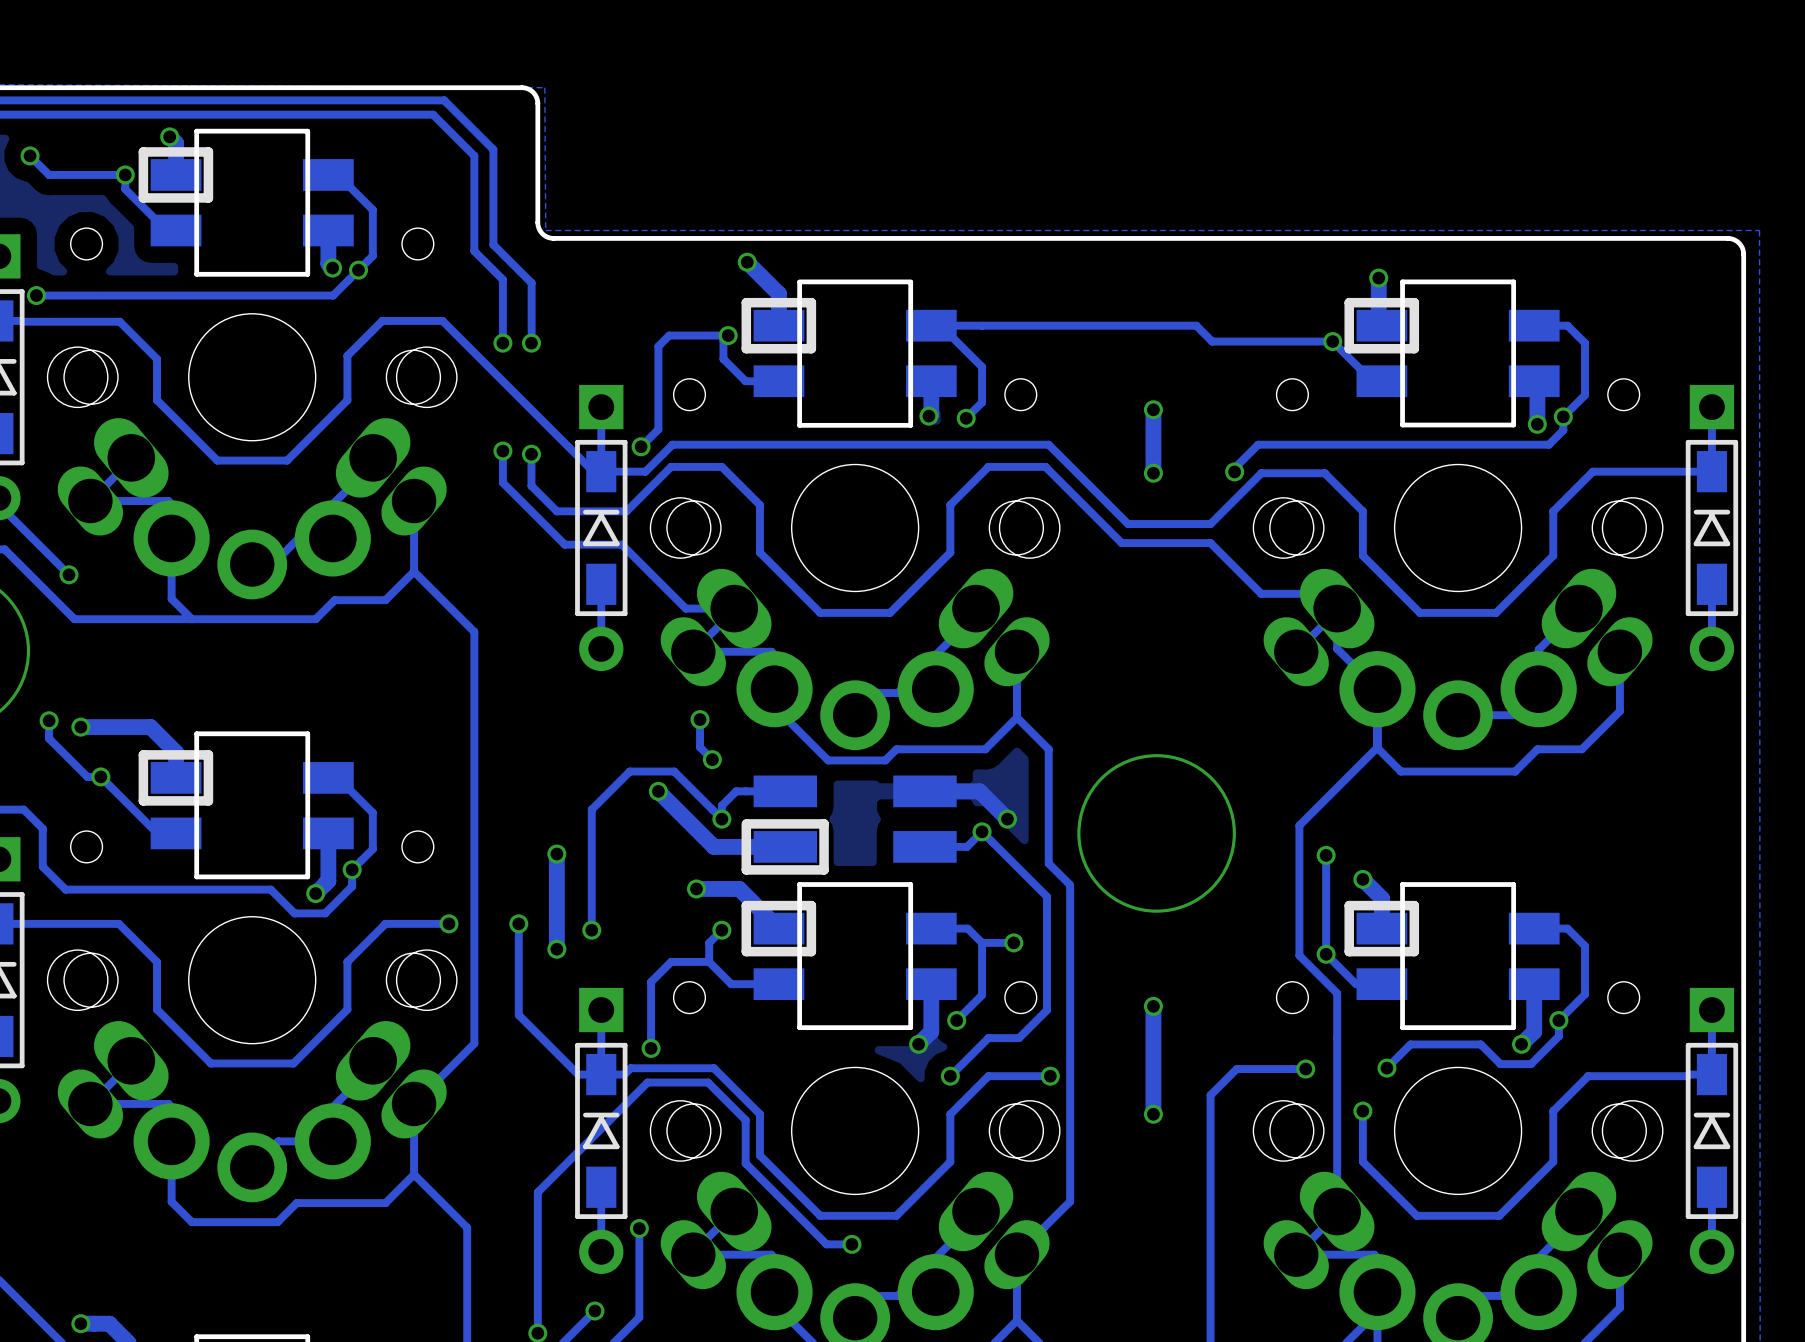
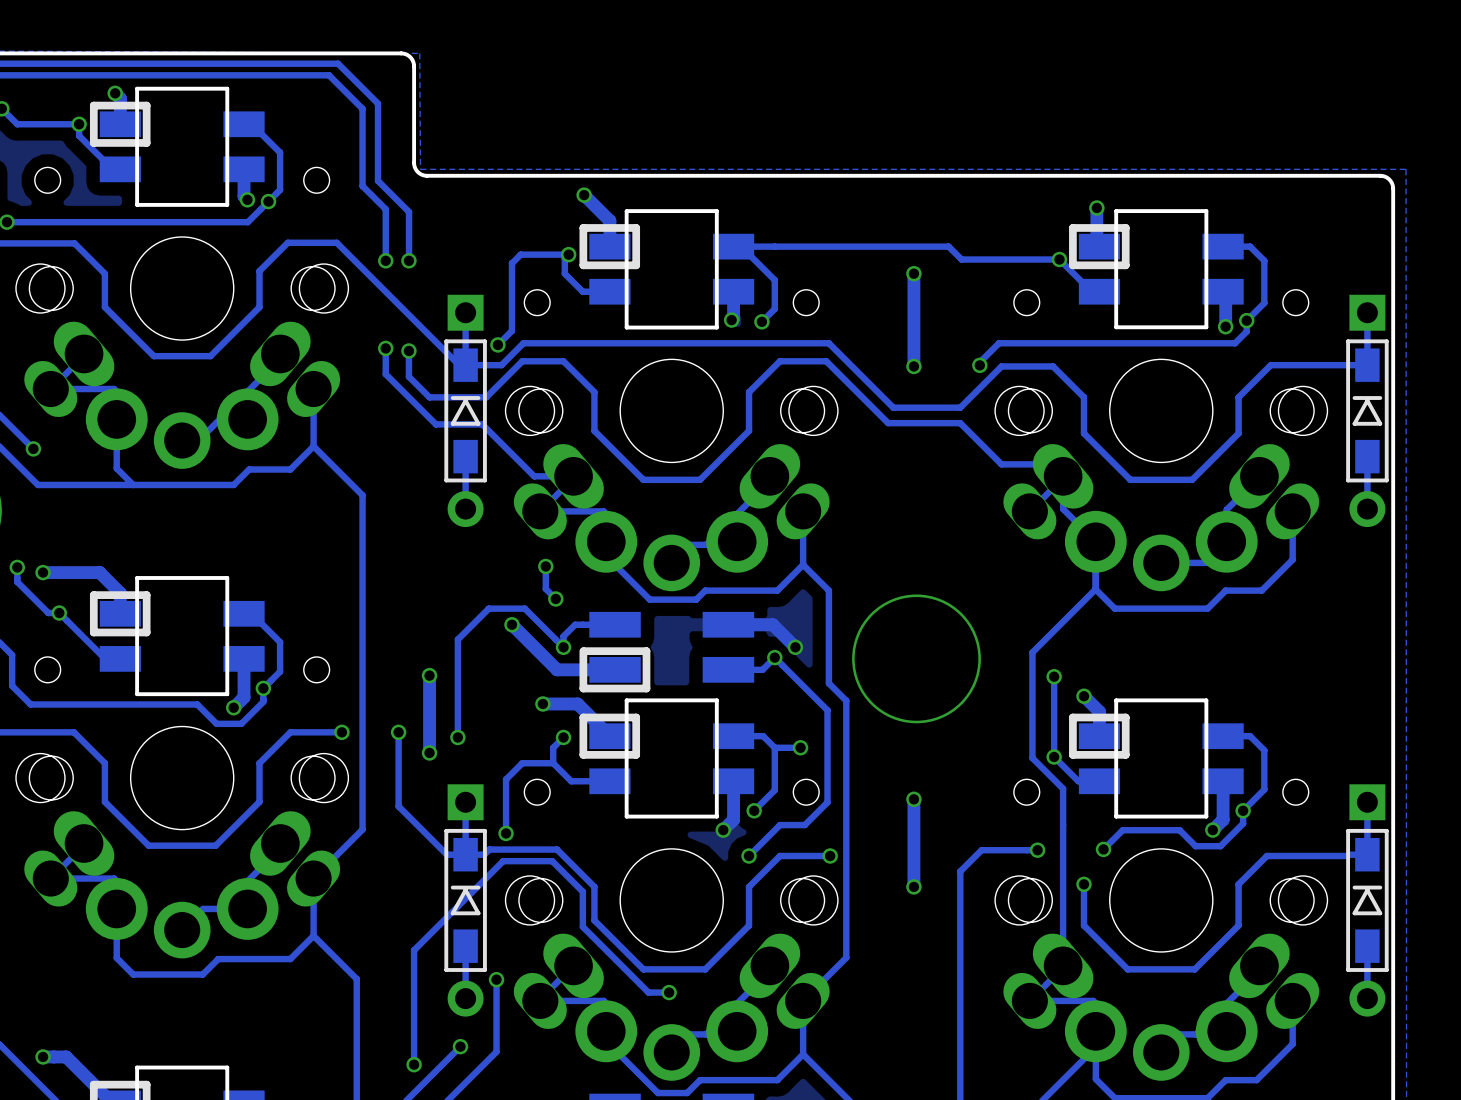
track: none -> (913, 273) (913, 314)
via position: (1153, 409) -> (913, 273)

